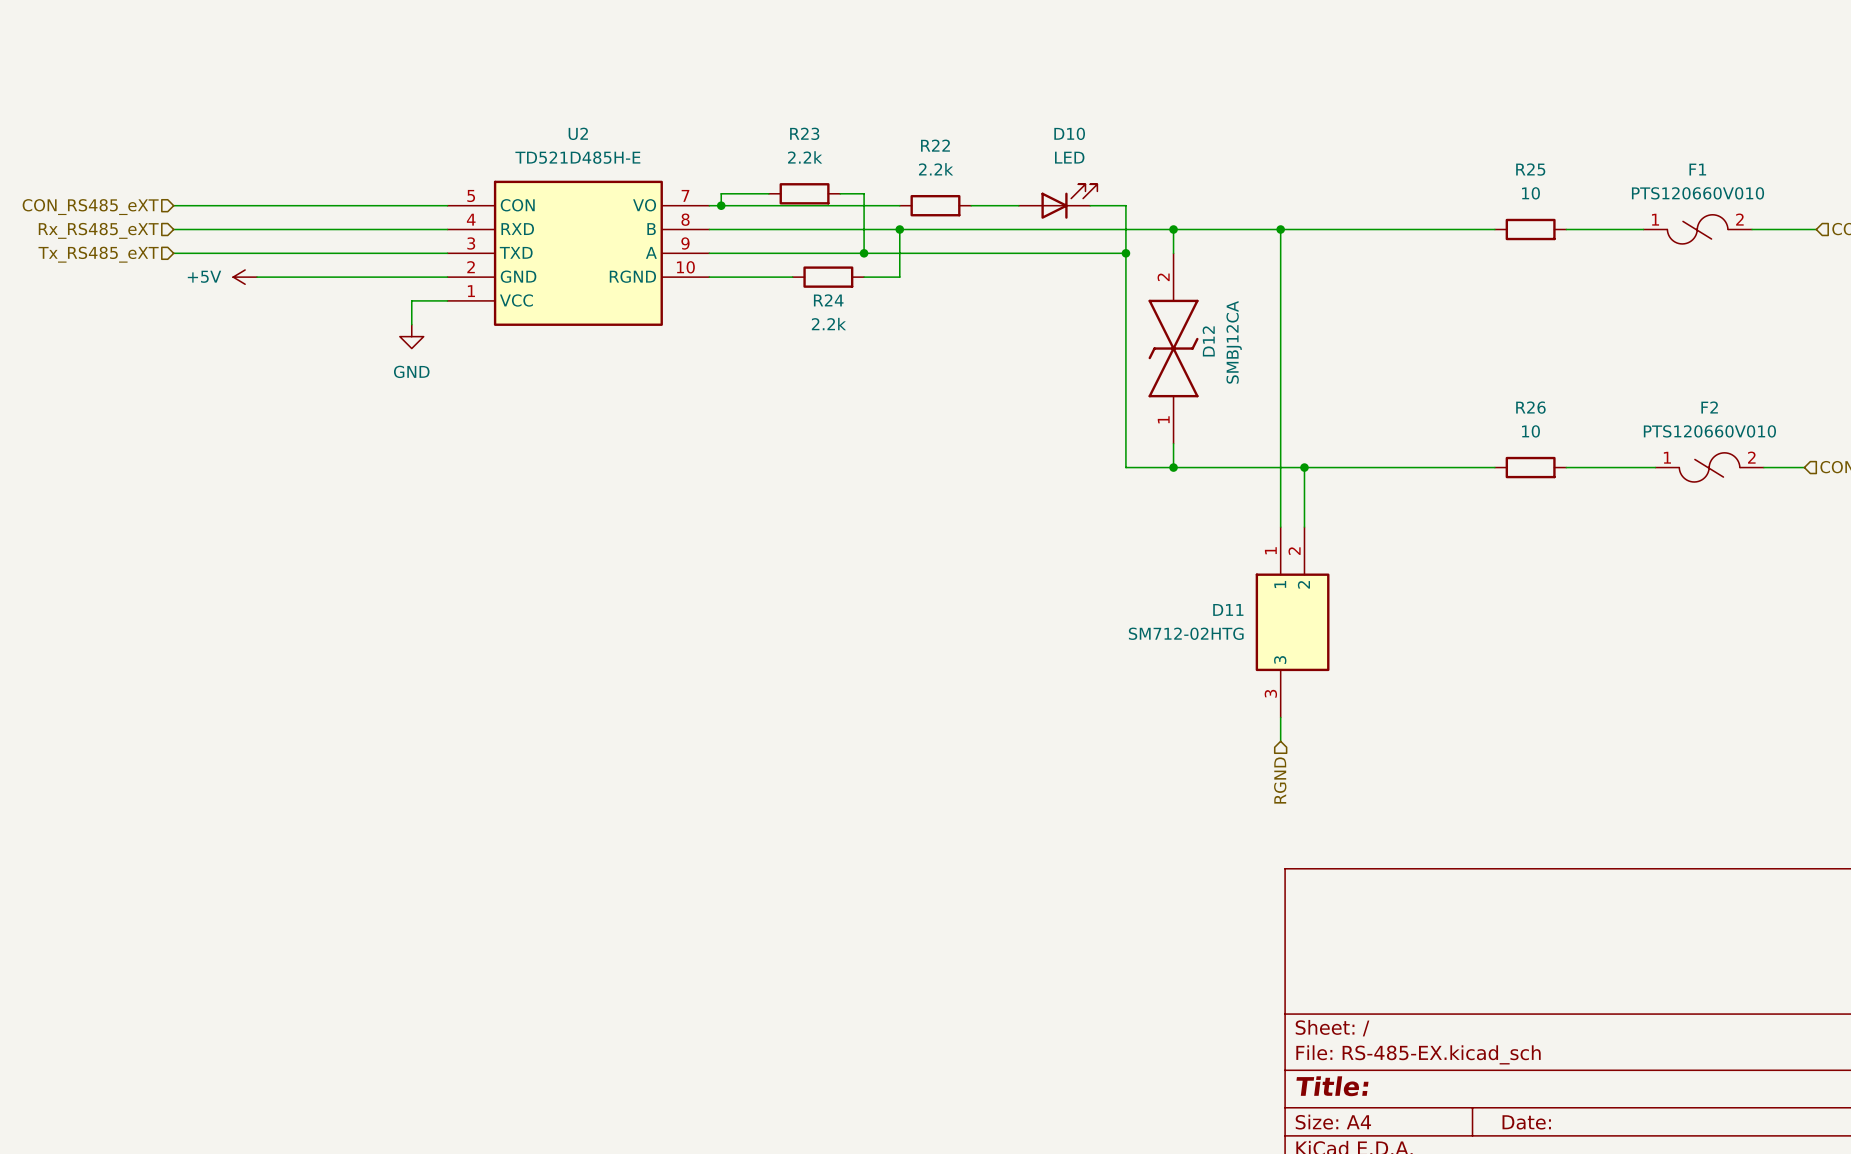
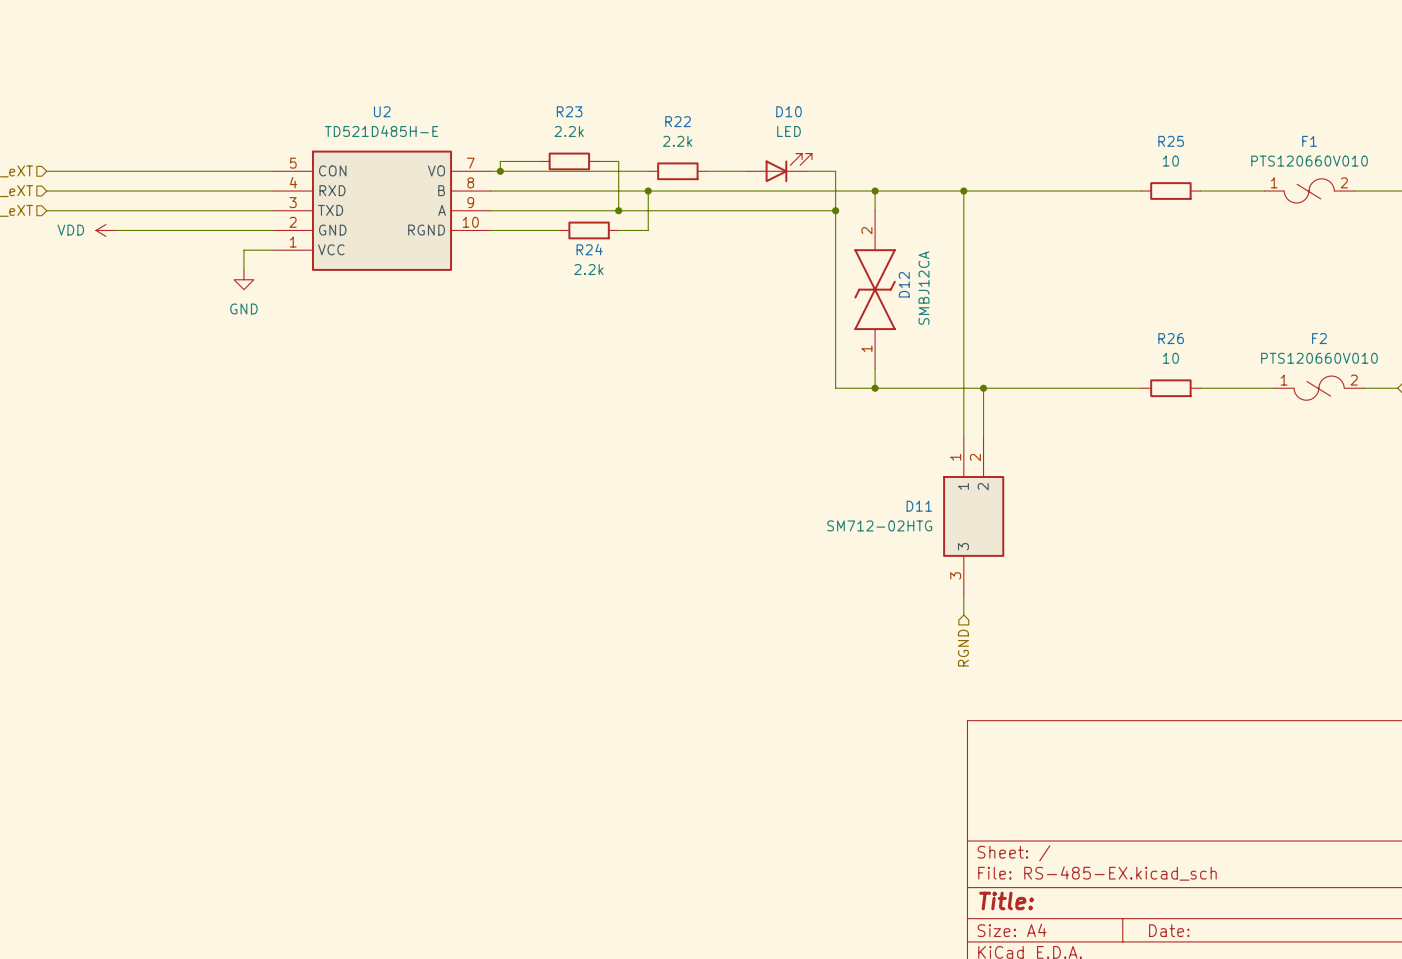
power symbol: +5V (245, 277) -> VDD (105, 230)

